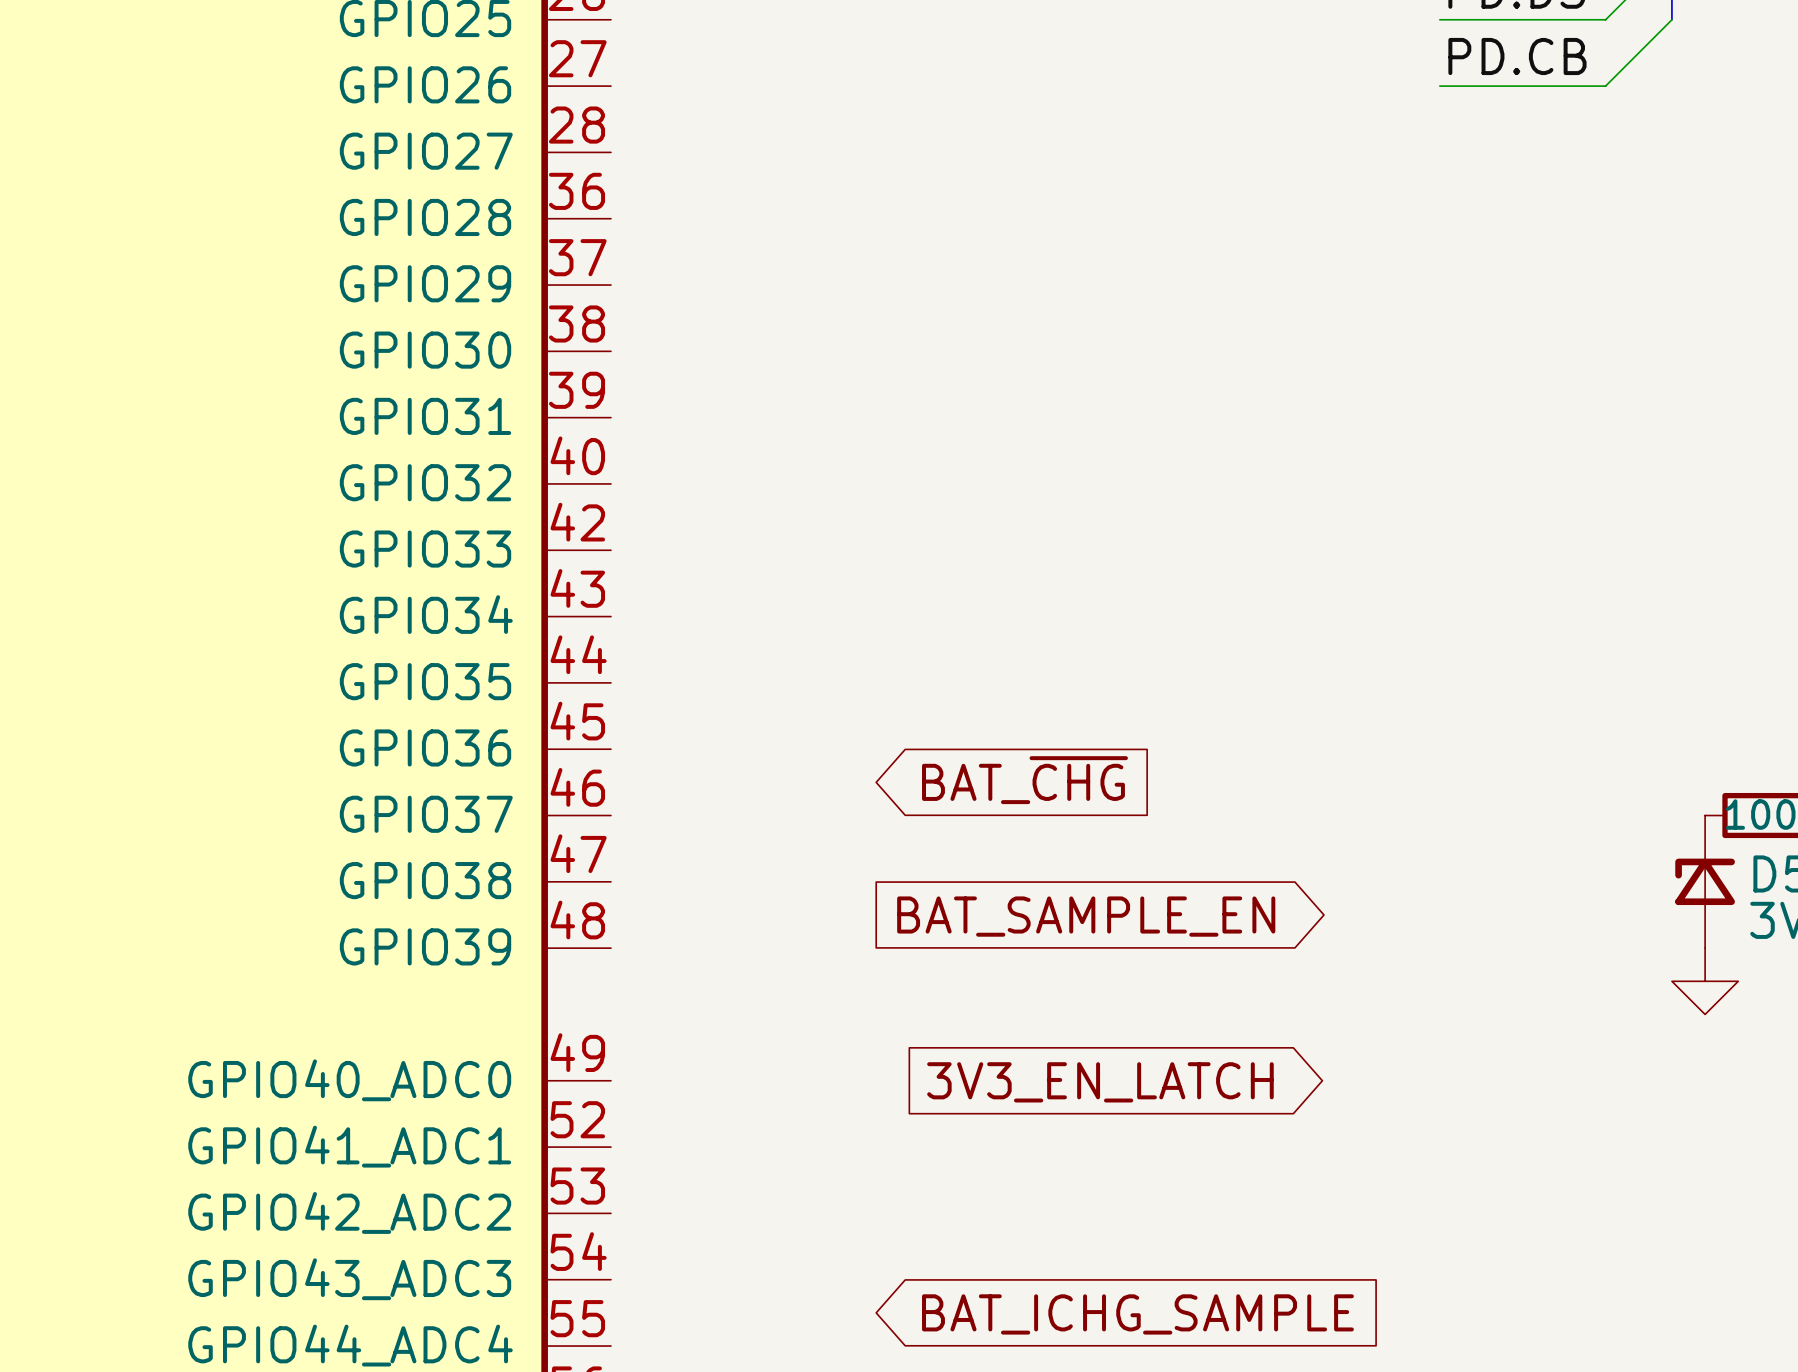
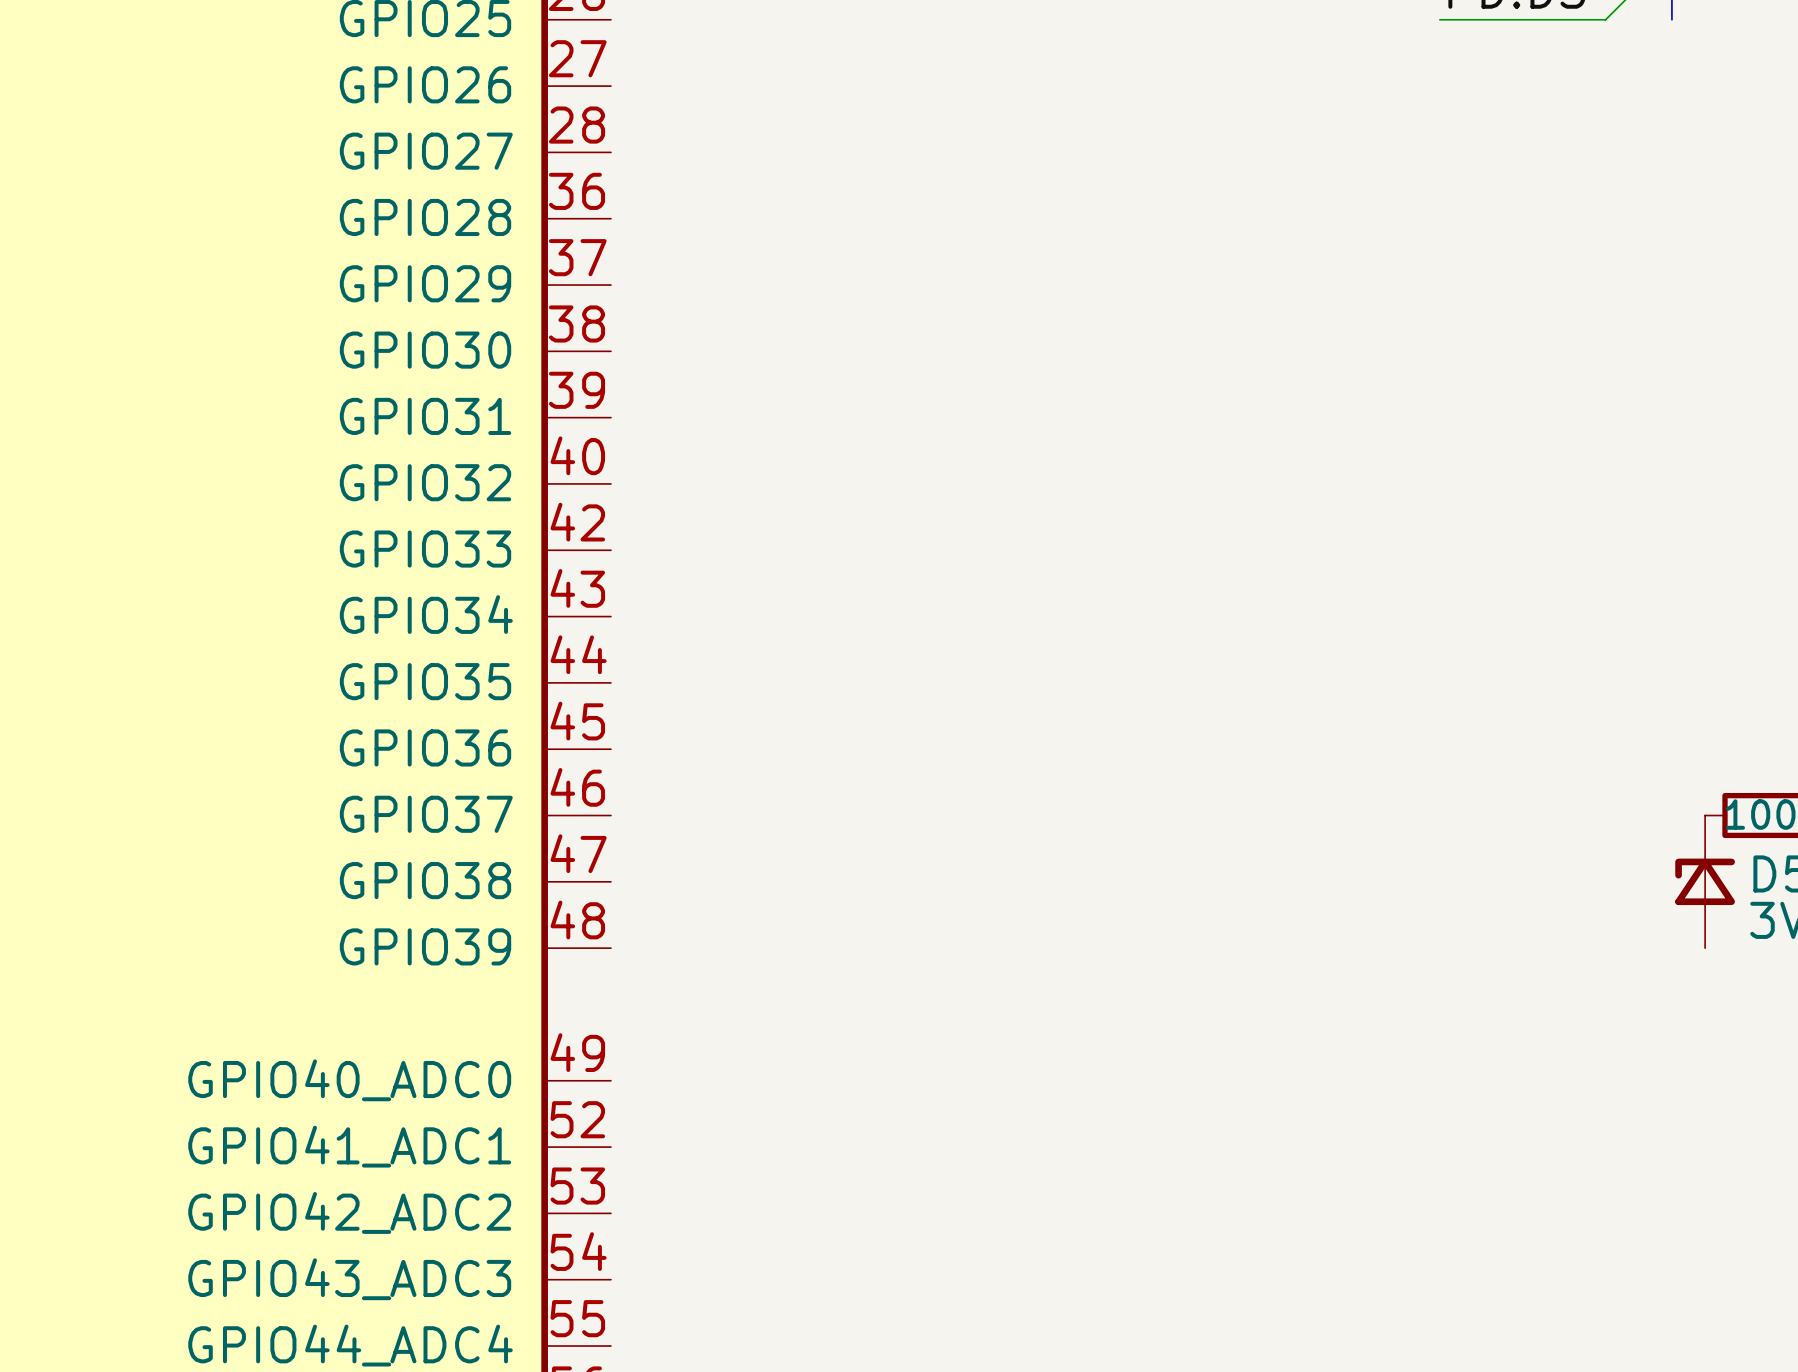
wire: (1671, 19) (1605, 86) (1439, 86) -> none
label: PD.CB (1517, 56) -> none
global label: BAT_~{CHG} (1024, 780) -> none
global label: BAT_SAMPLE_EN (1086, 916) -> none
power symbol: (1705, 981) -> none
global label: 3V3_EN_LATCH (1100, 1082) -> none
global label: BAT_ICHG_SAMPLE (1137, 1314) -> none

